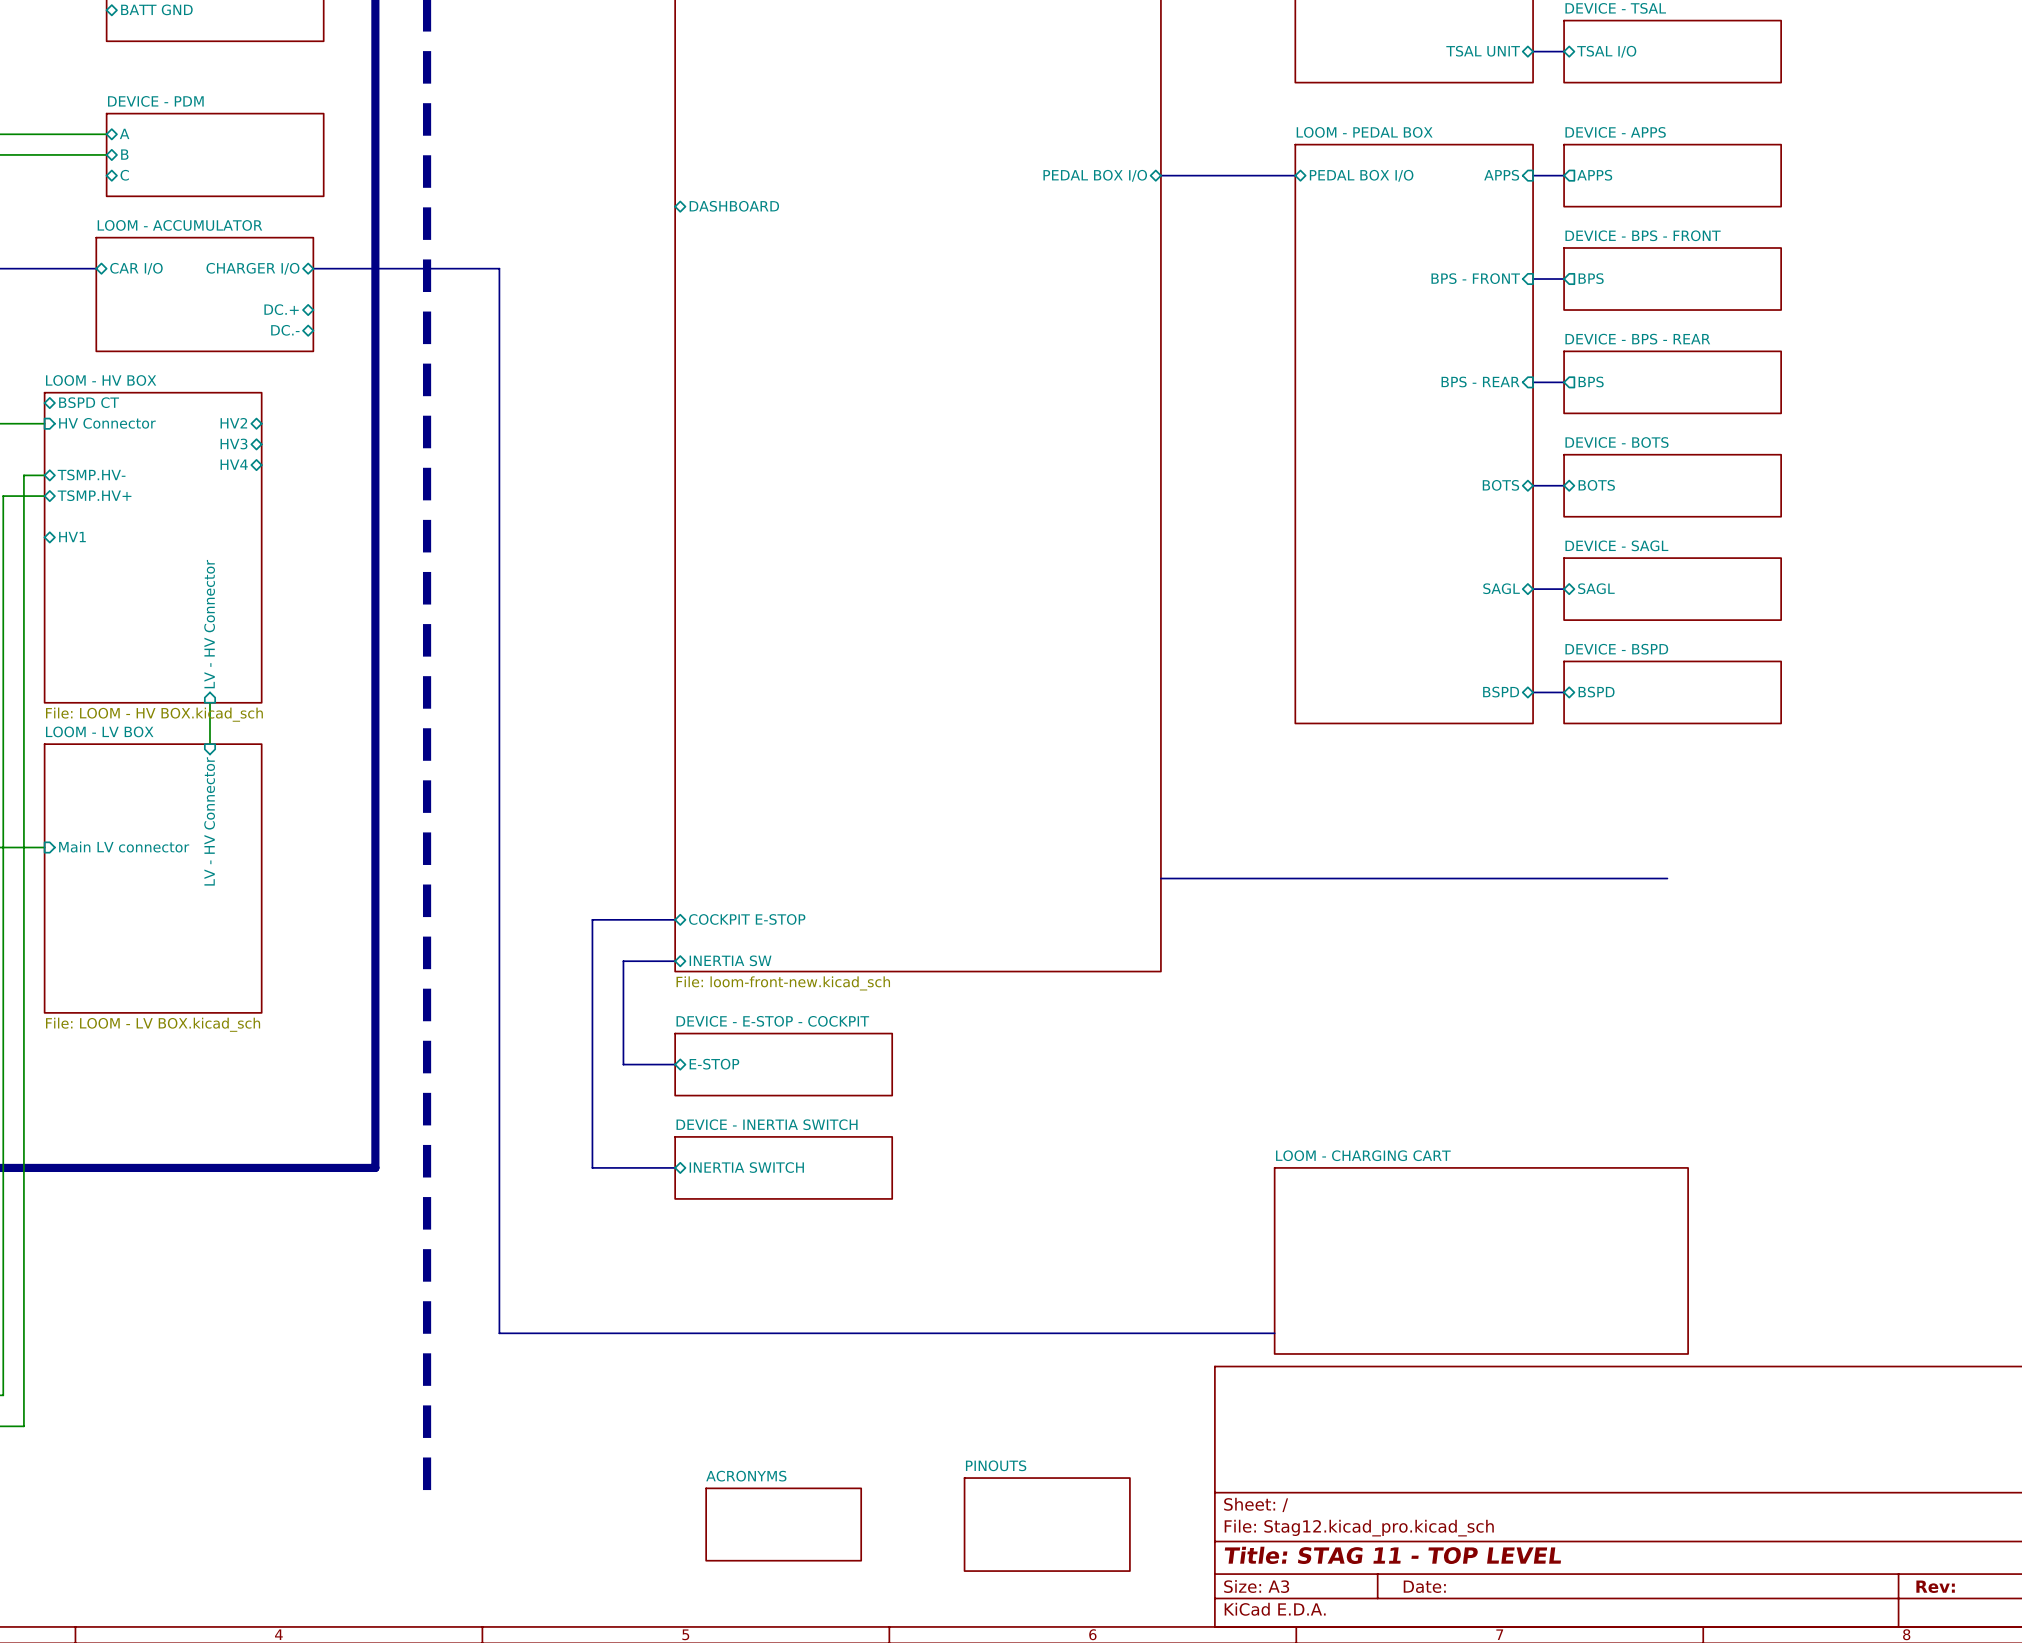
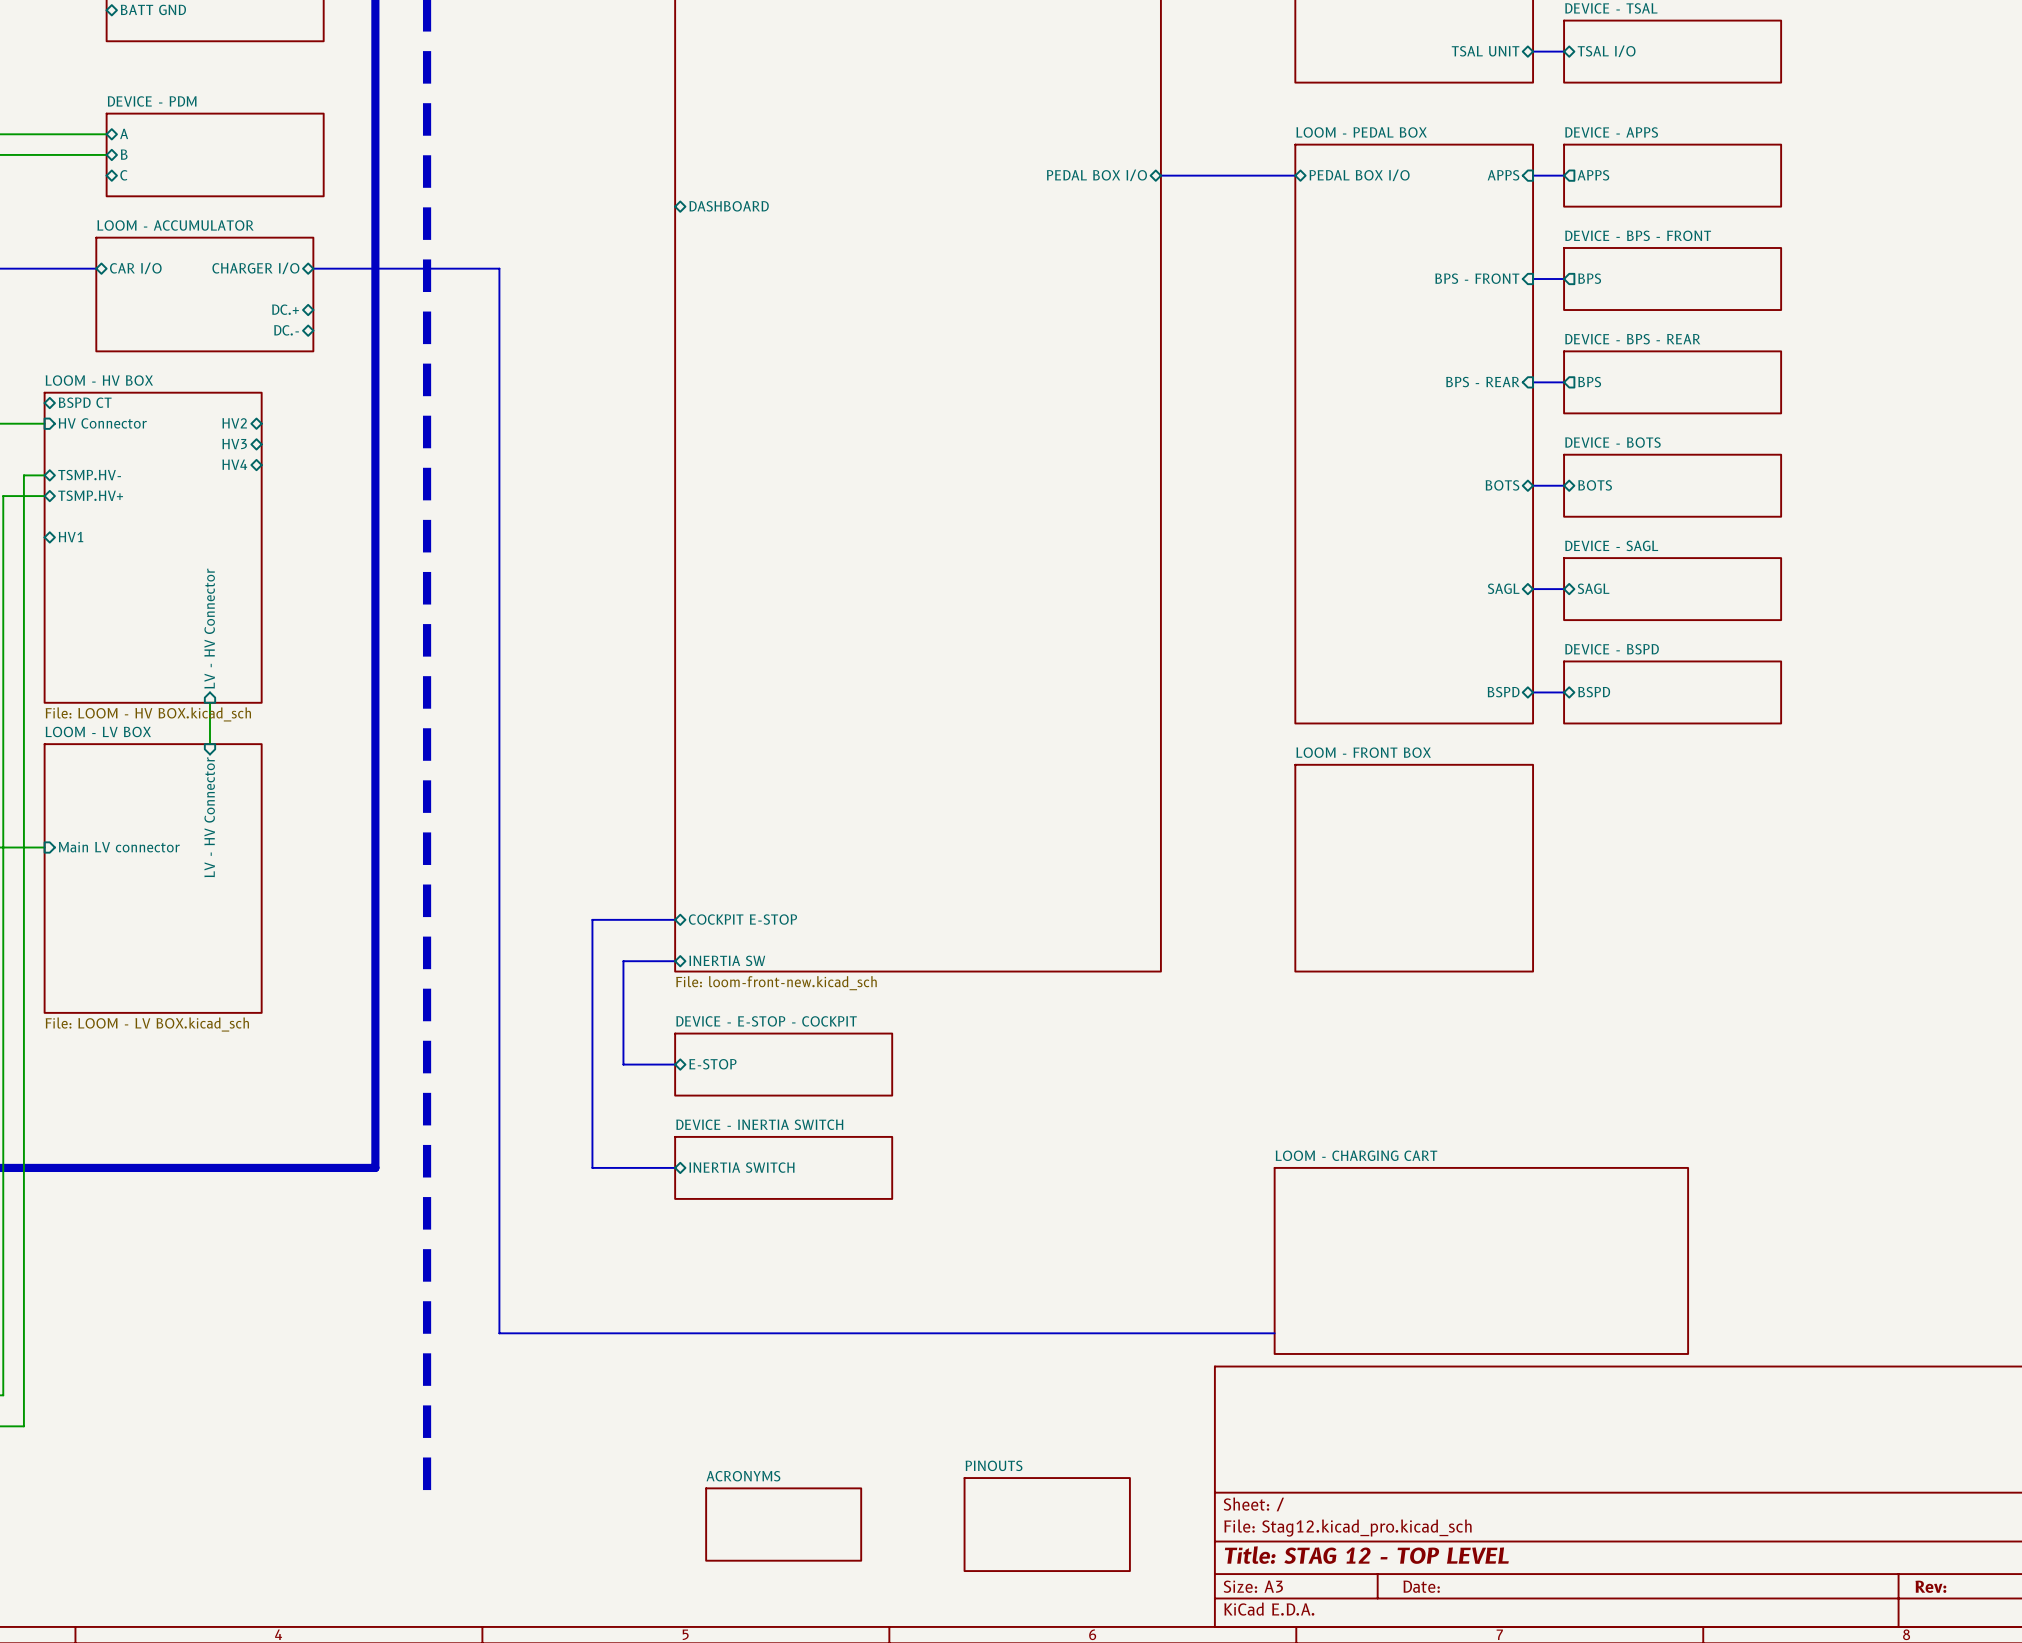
sheet LOOM - FRONT BOX: none -> (1414, 868)
bus: (1160, 878) (1667, 878) -> none
title block: Title: STAG 11 - TOP LEVEL (1392, 1555) -> Title: STAG 12 - TOP LEVEL (1366, 1555)

